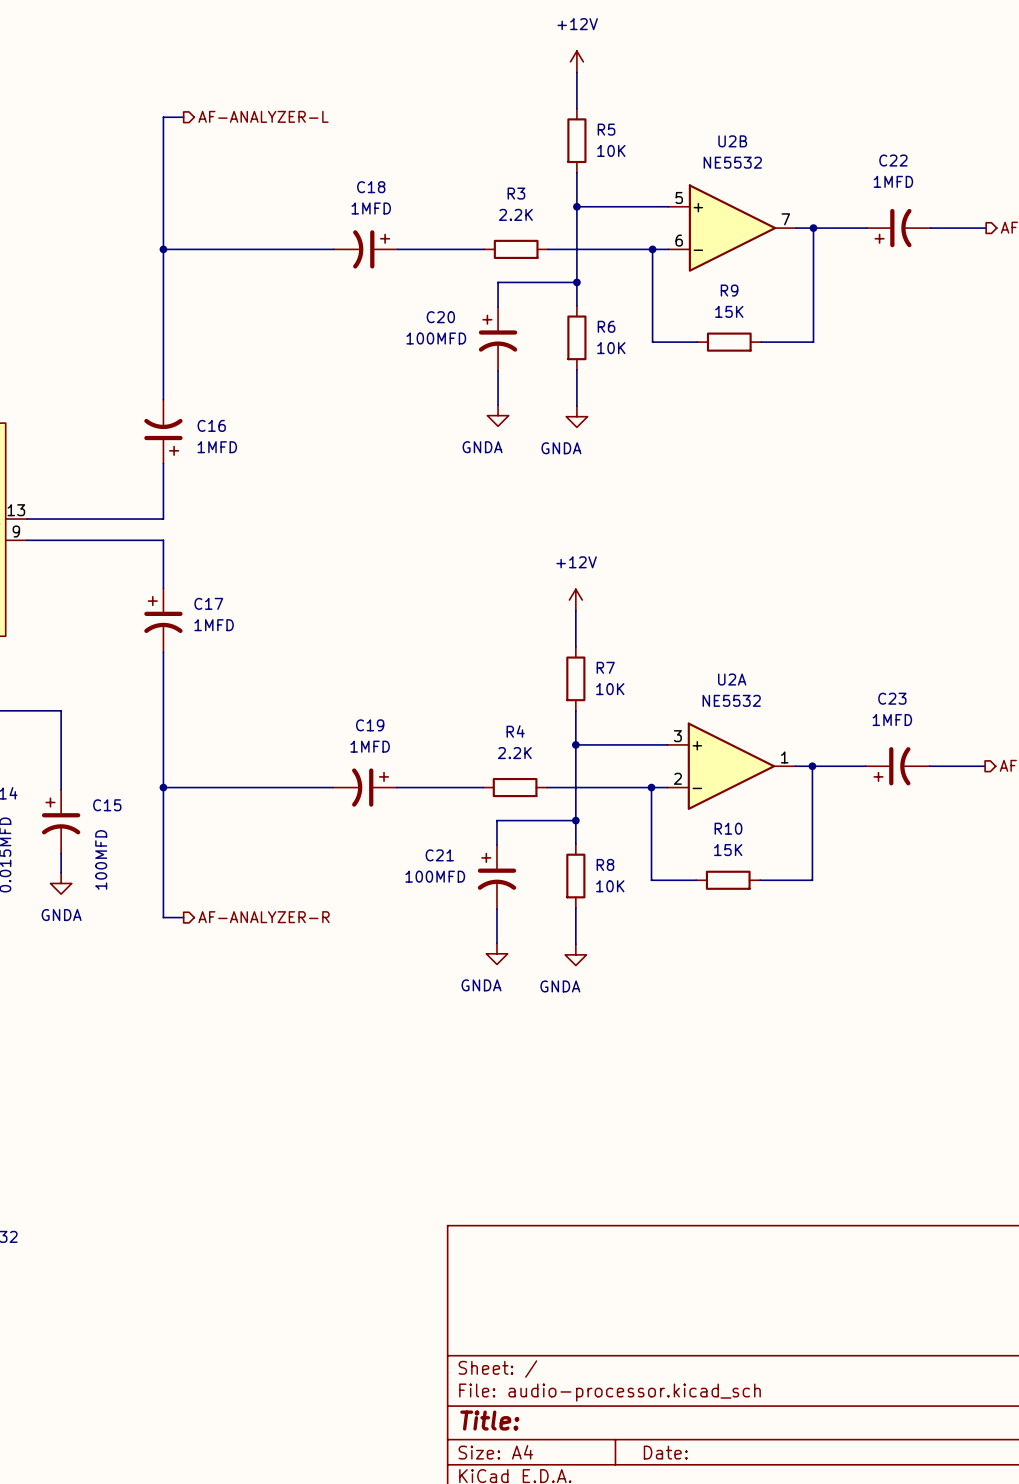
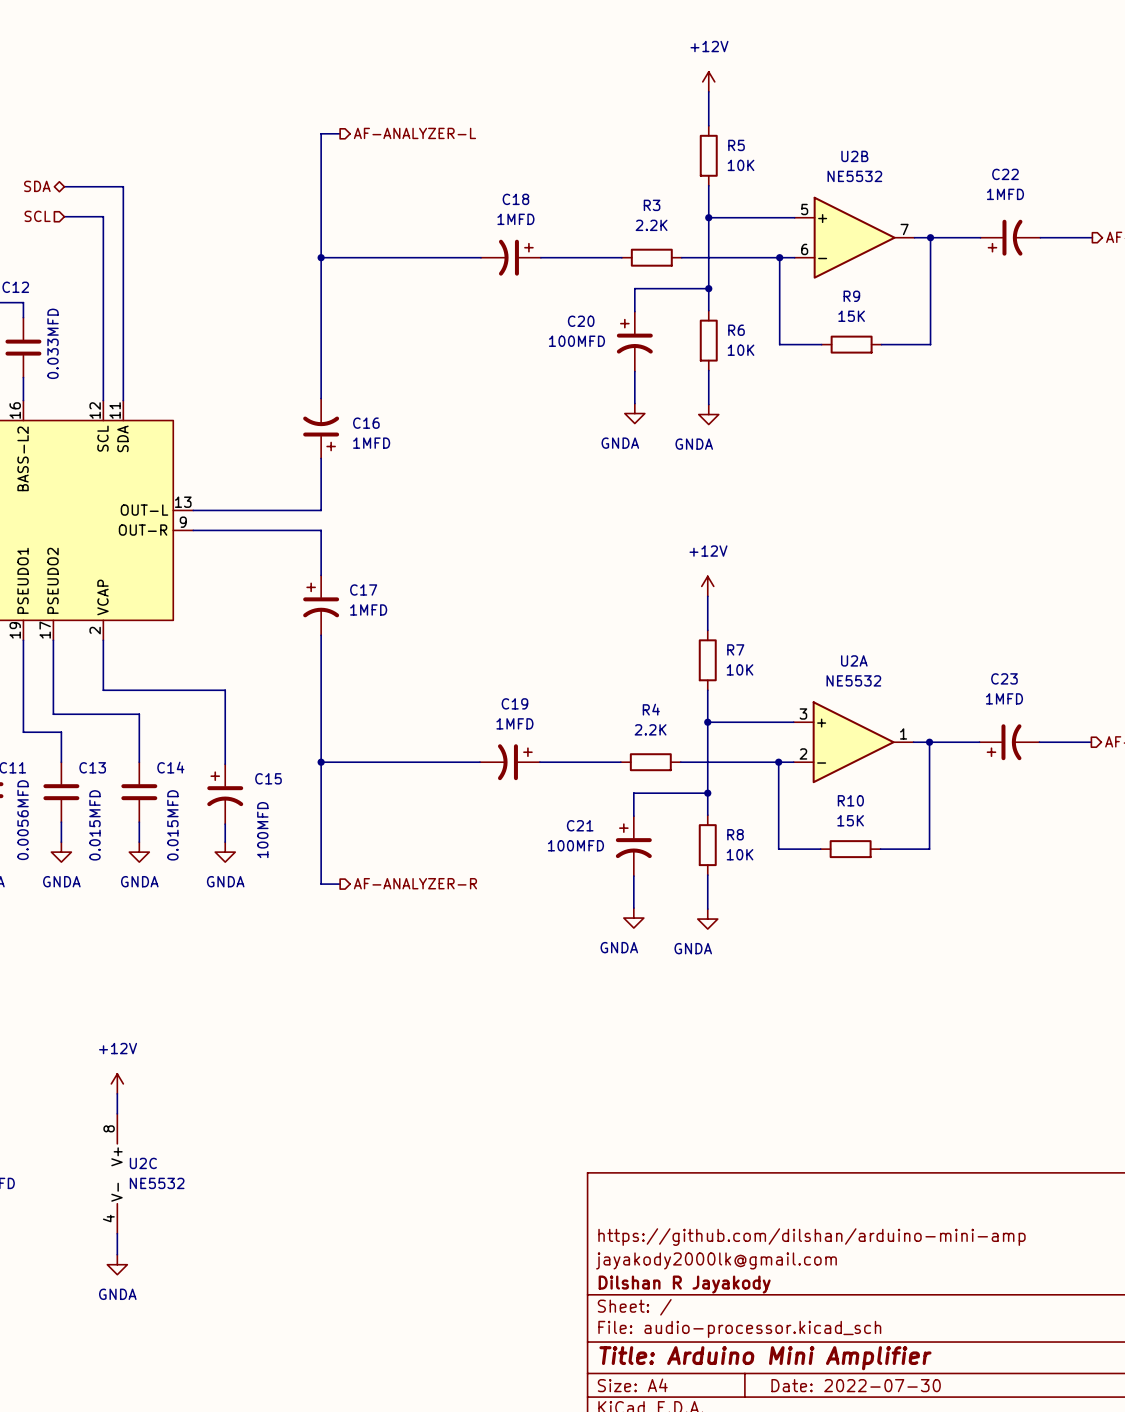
title block: none -> https://github.com/dilshan/arduino-mini-amp (811, 1237)
title block: none -> jayakody2000lk@gmail.com (716, 1260)
title block: none -> Dilshan R Jayakody (684, 1284)
title block: Title: (489, 1420) -> Title: Arduino Mini Amplifier (765, 1358)
title block: Date: (665, 1452) -> Date: 2022-07-30 (856, 1385)

